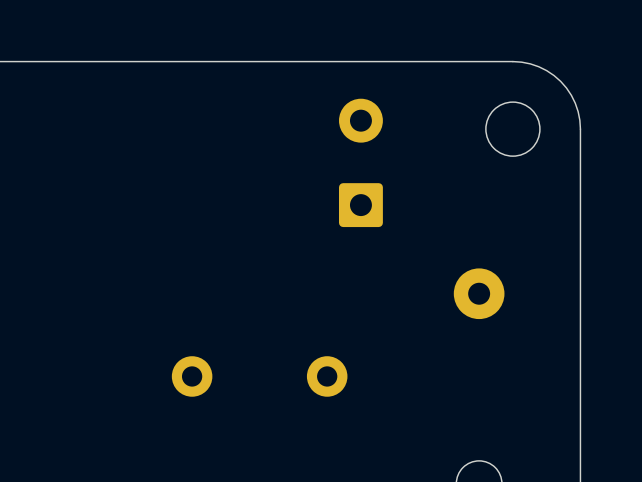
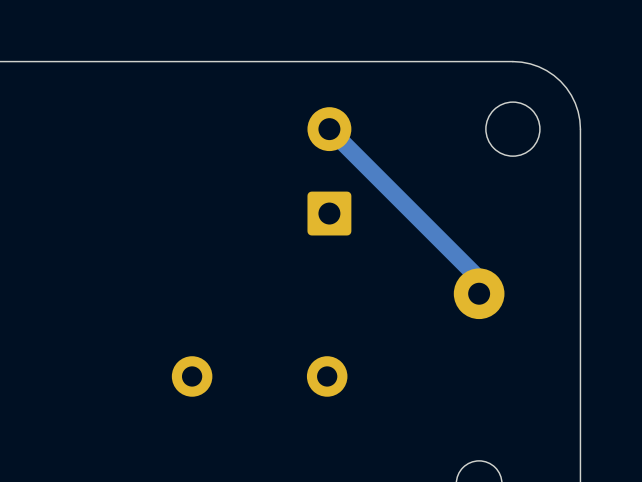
track: none -> (329, 129) (479, 278) (479, 293)
part position: (360, 162) -> (329, 171)

